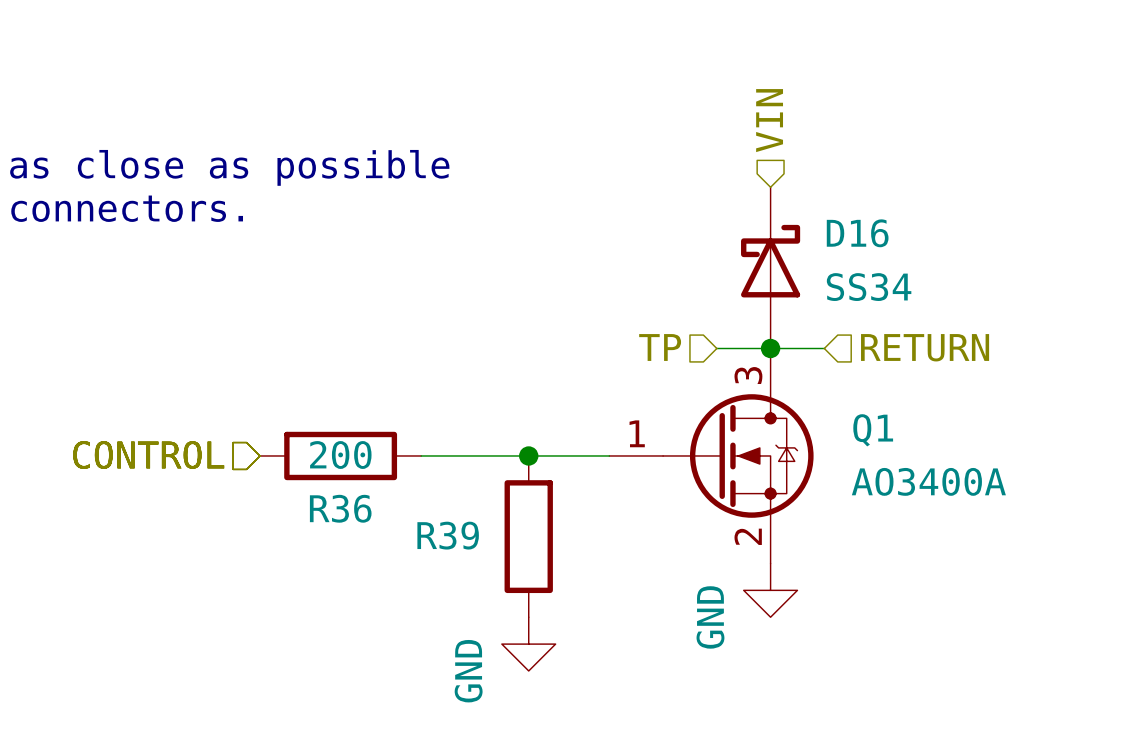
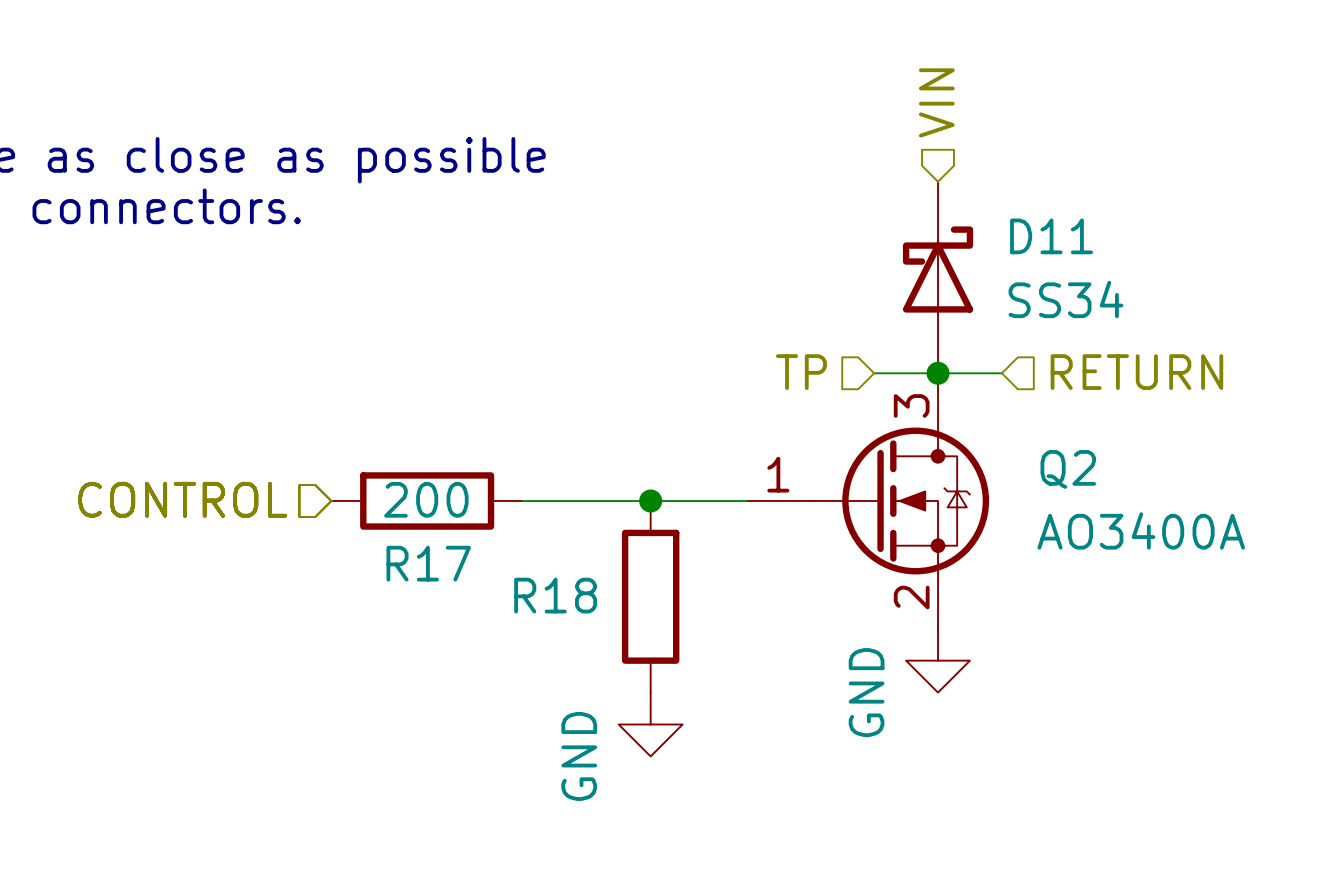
D16 name: D16 (857, 233) -> D11 (1051, 236)
Q1 name: Q1 (873, 430) -> Q2 (1068, 469)
R36 name: R36 (340, 508) -> R17 (428, 563)
R39 name: R39 (448, 535) -> R18 (555, 595)

